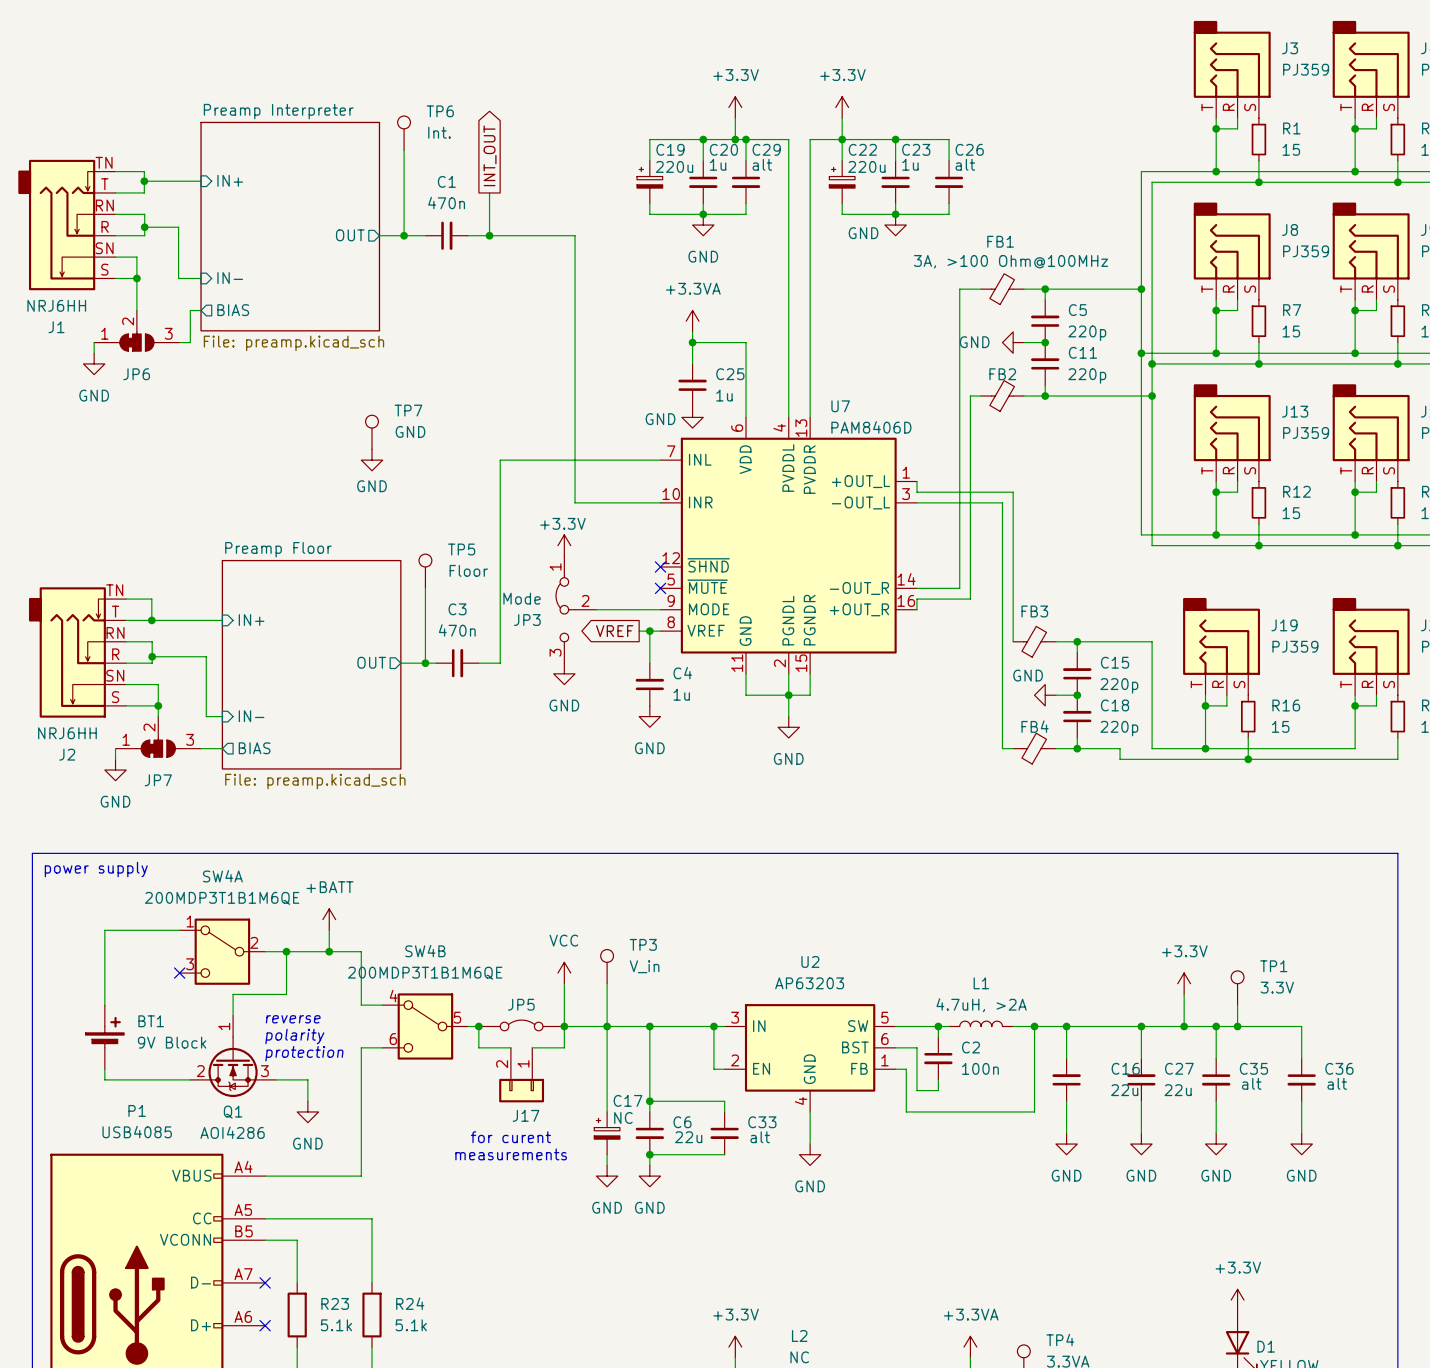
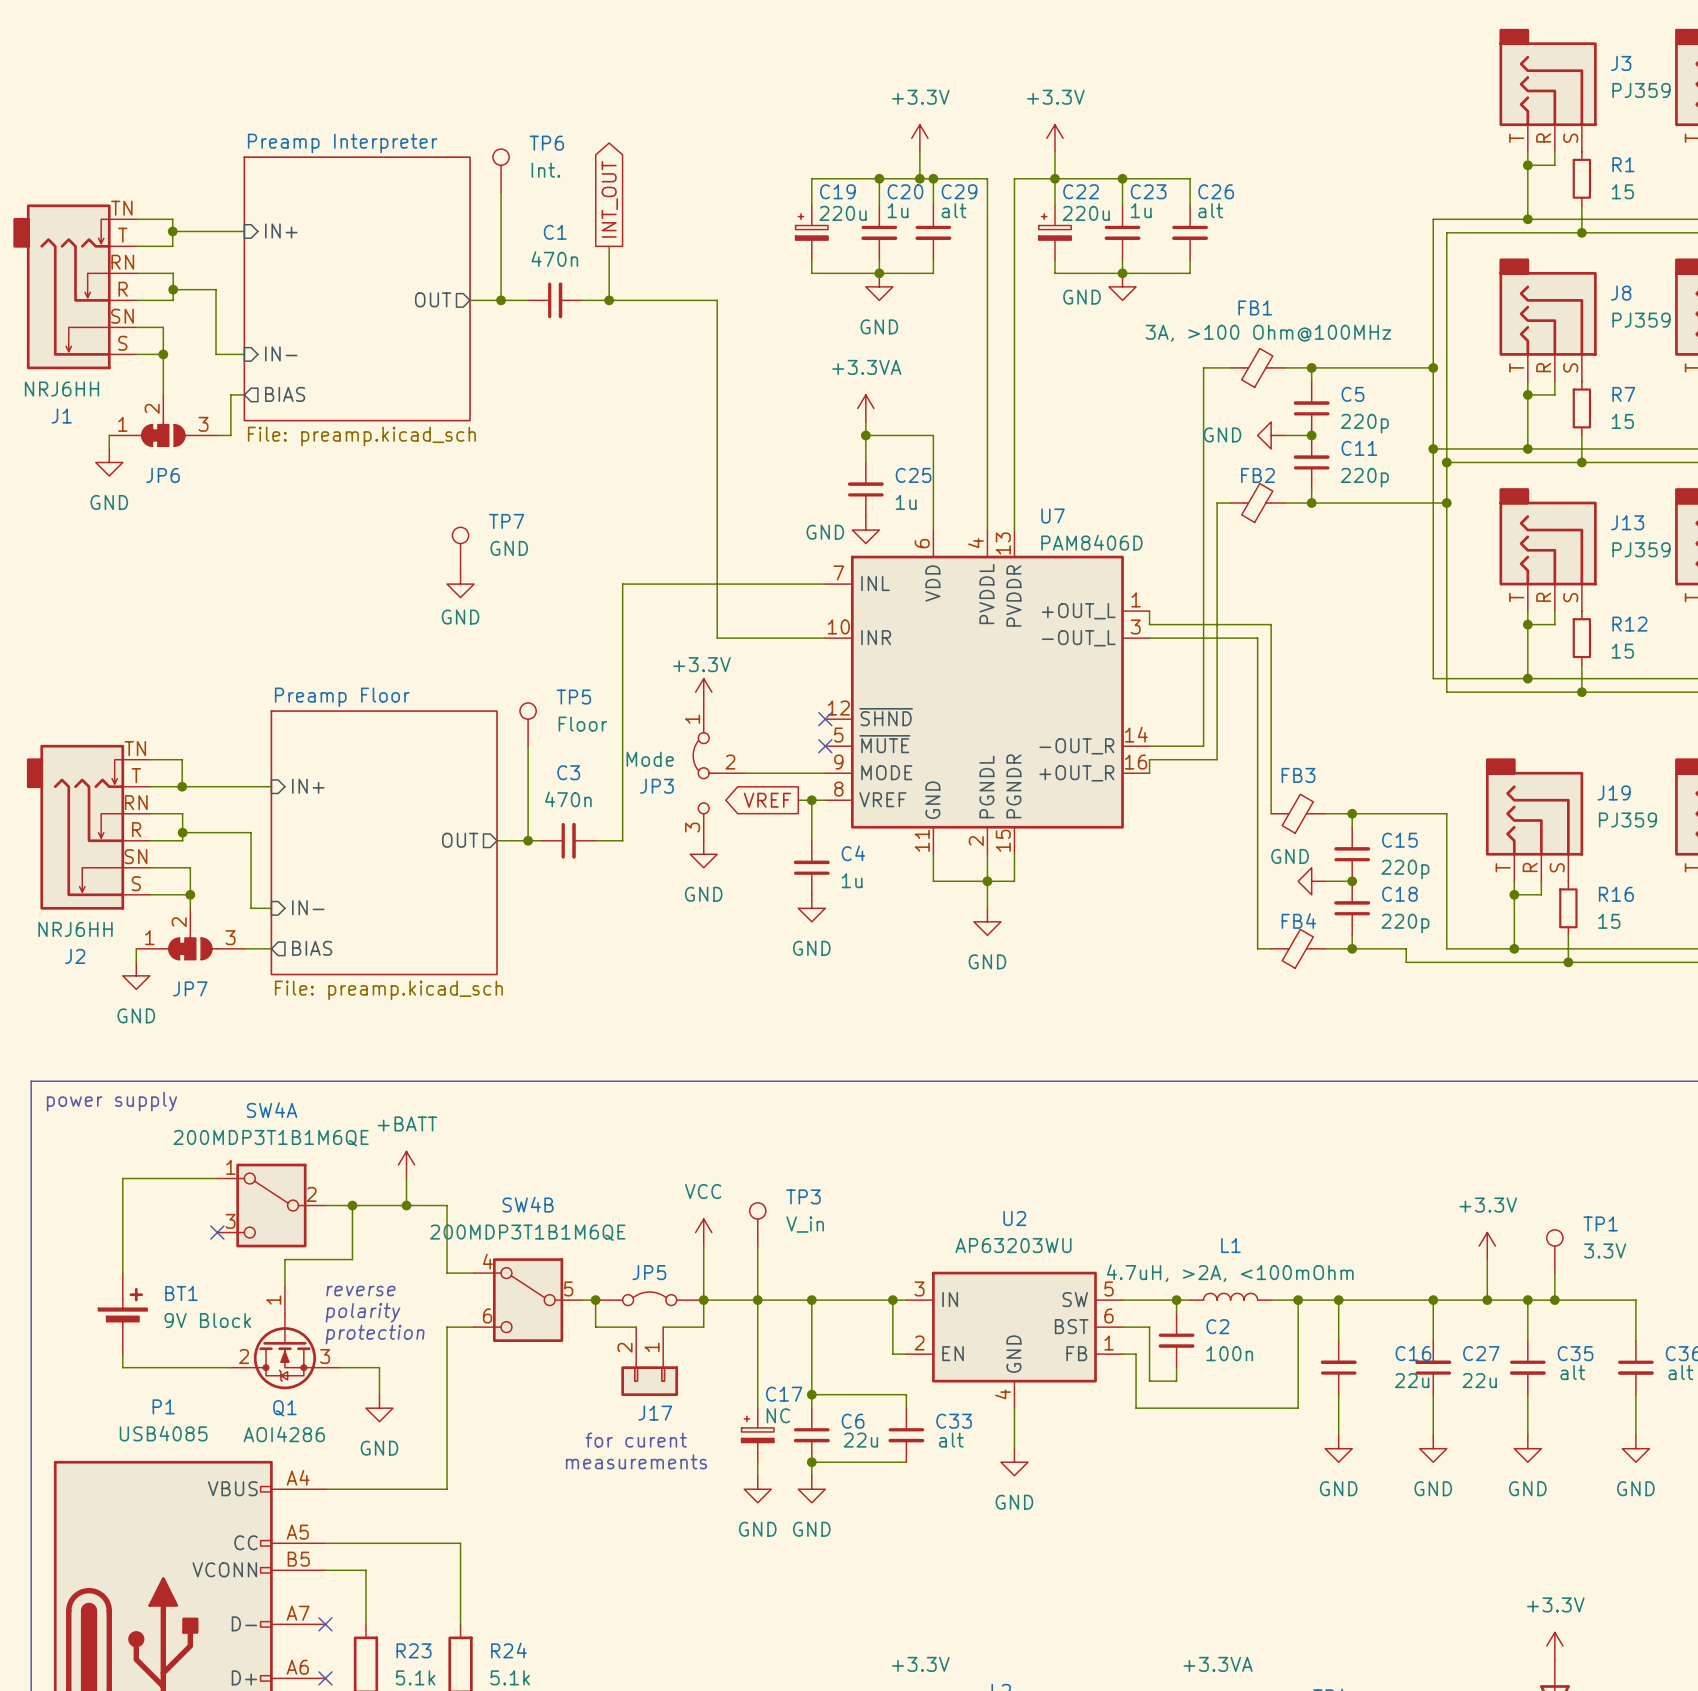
U2 value: AP63203 (809, 983) -> AP63203WU (1013, 1245)
L1 value: 4.7uH, >2A (981, 1005) -> 4.7uH, >2A, <100mOhm (1230, 1273)

